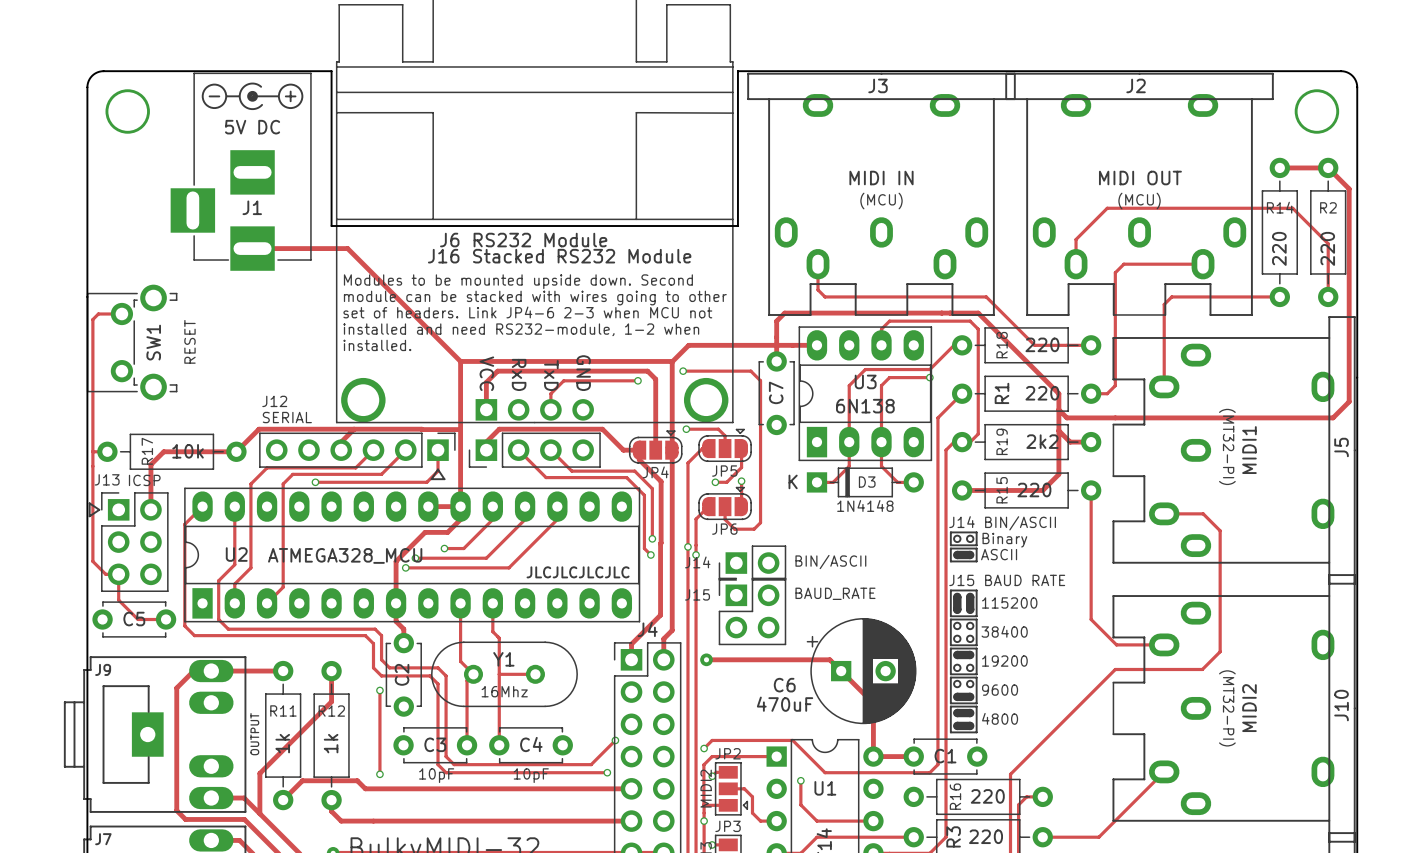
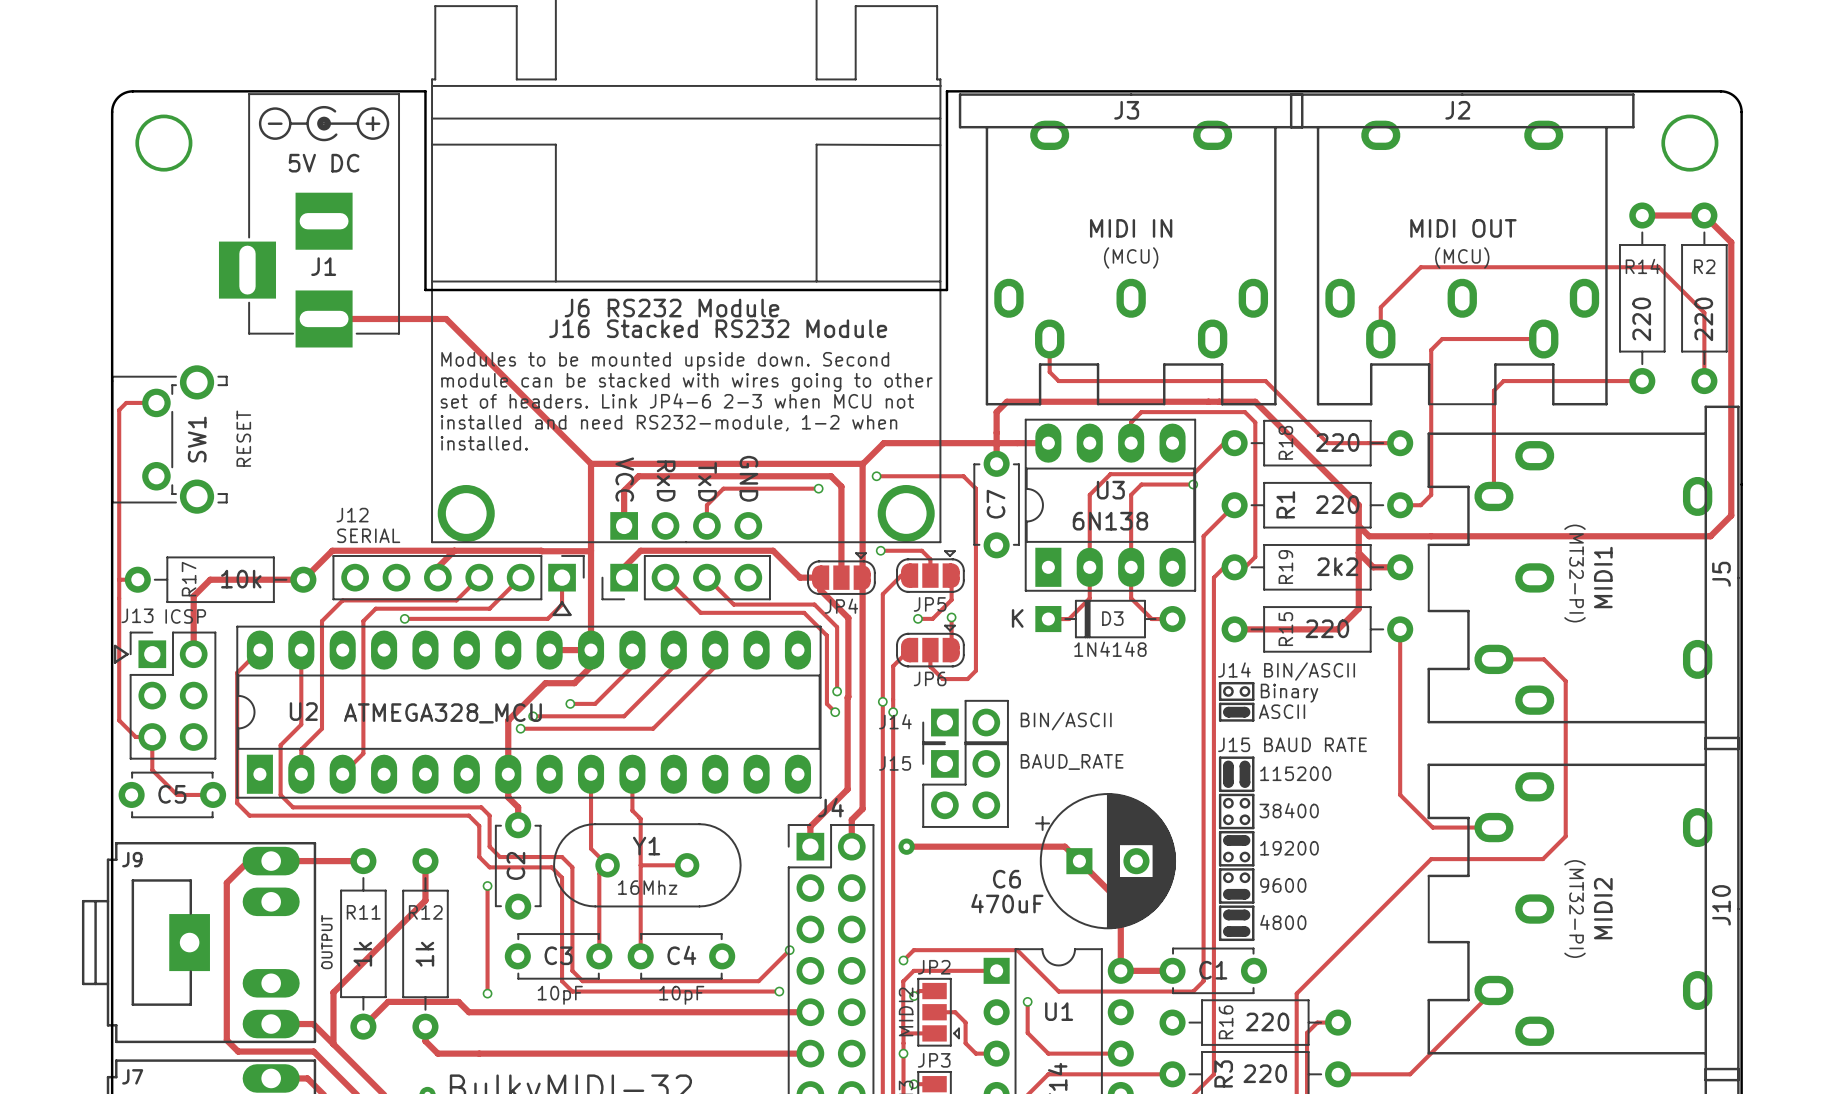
text: JLCJLCJLCJLC (578, 572) -> none

